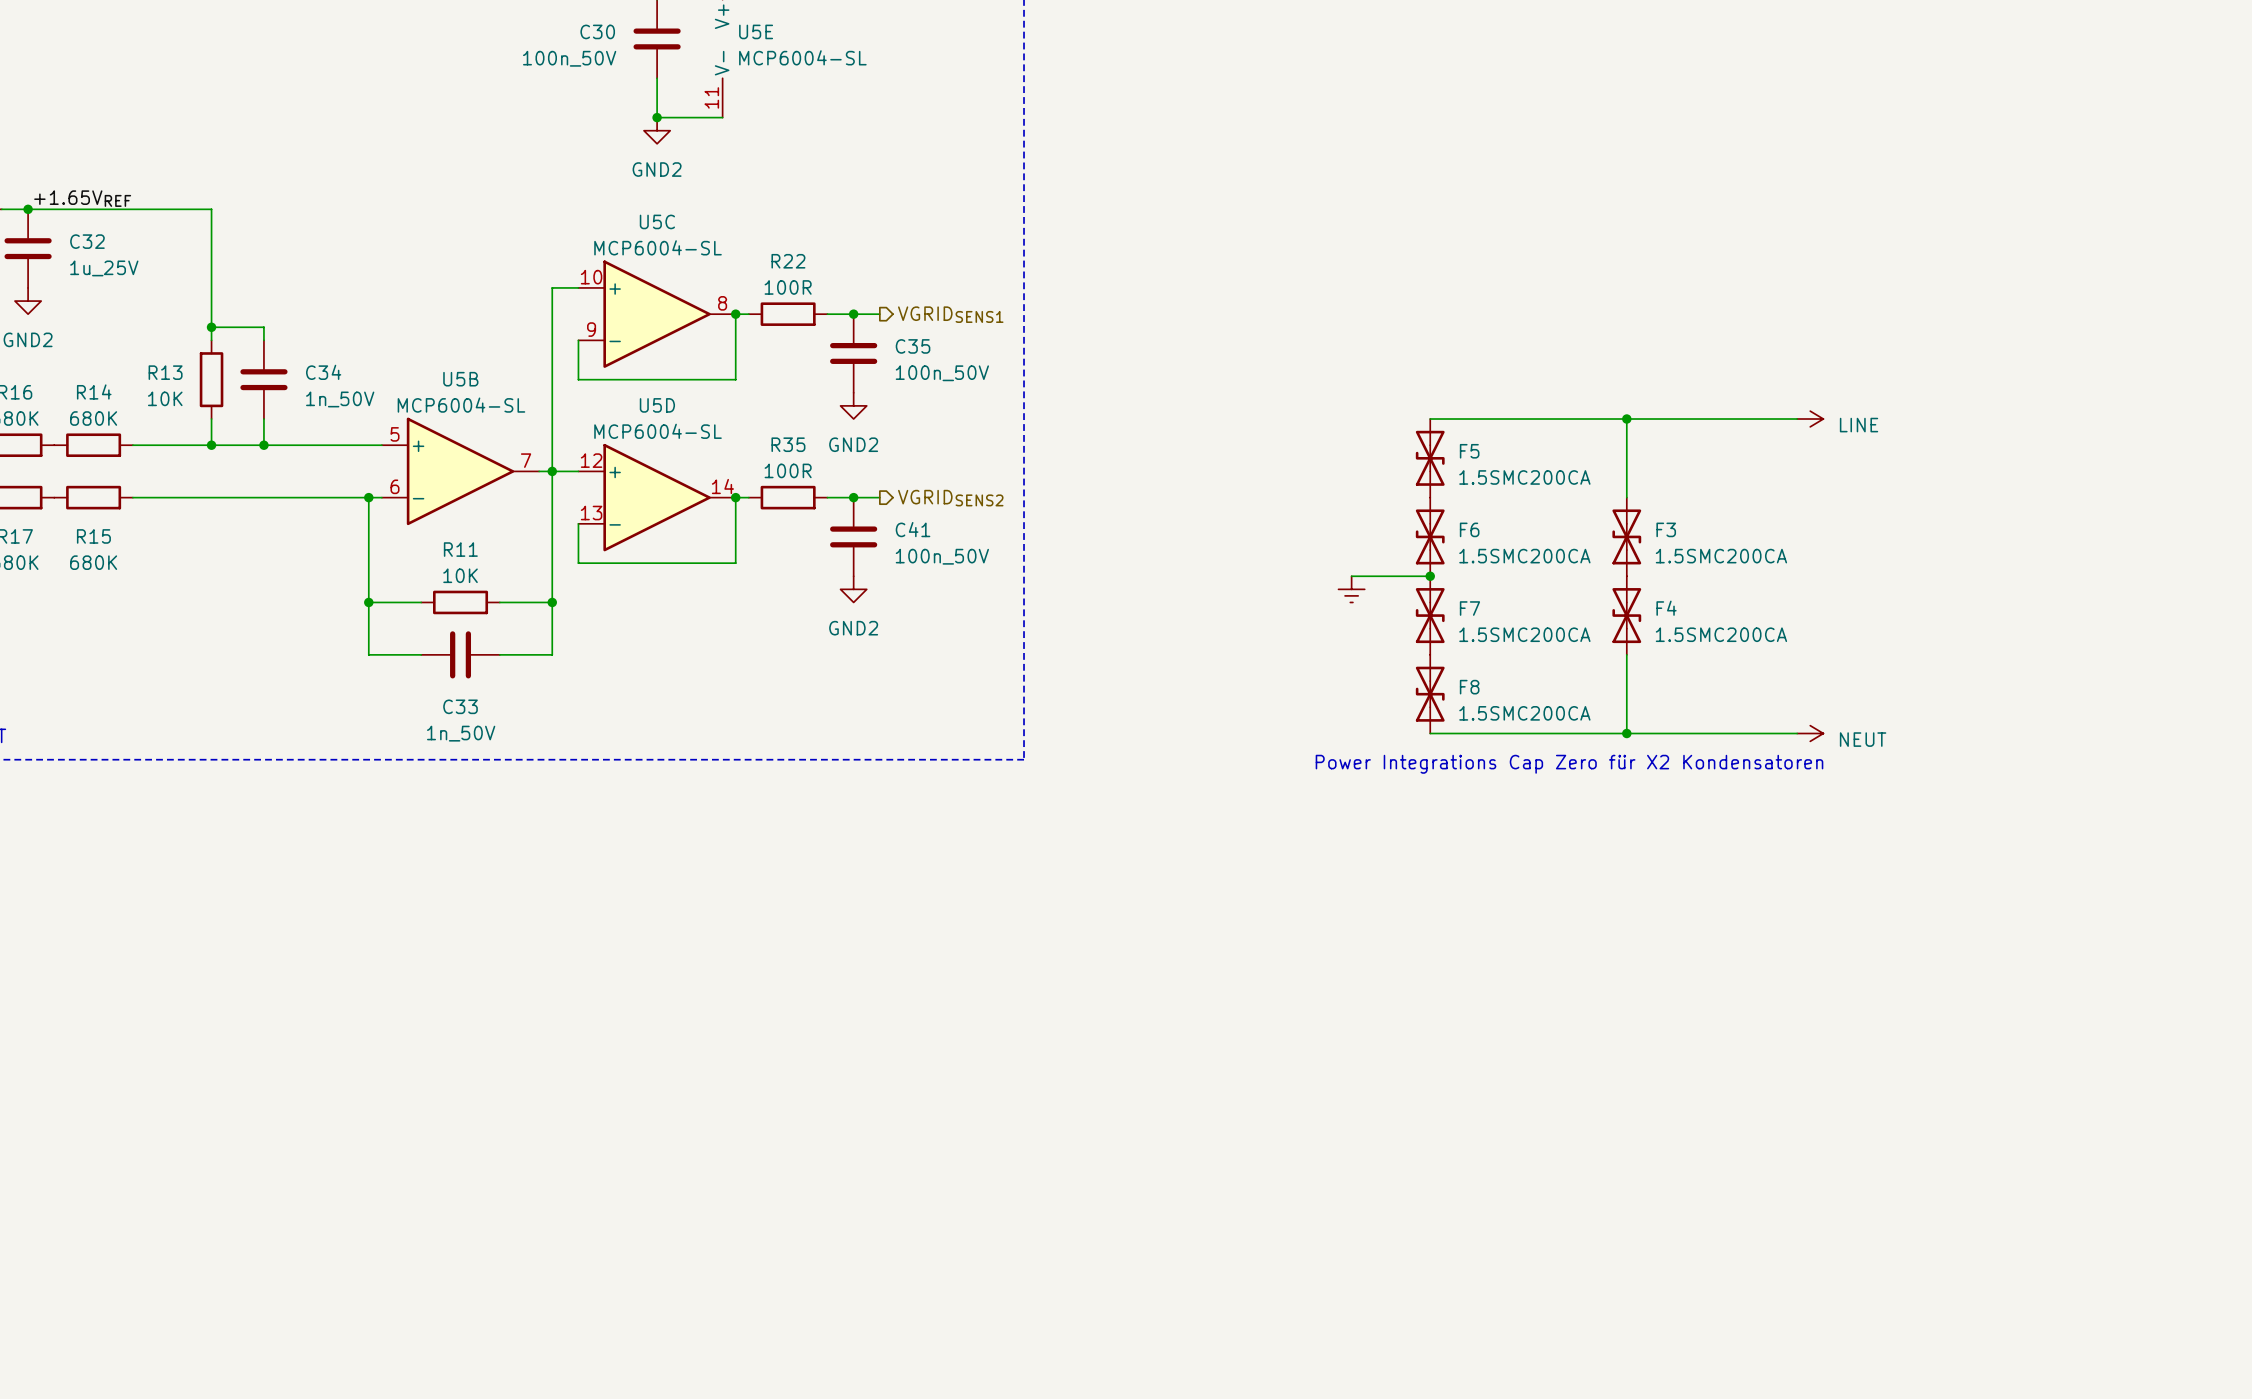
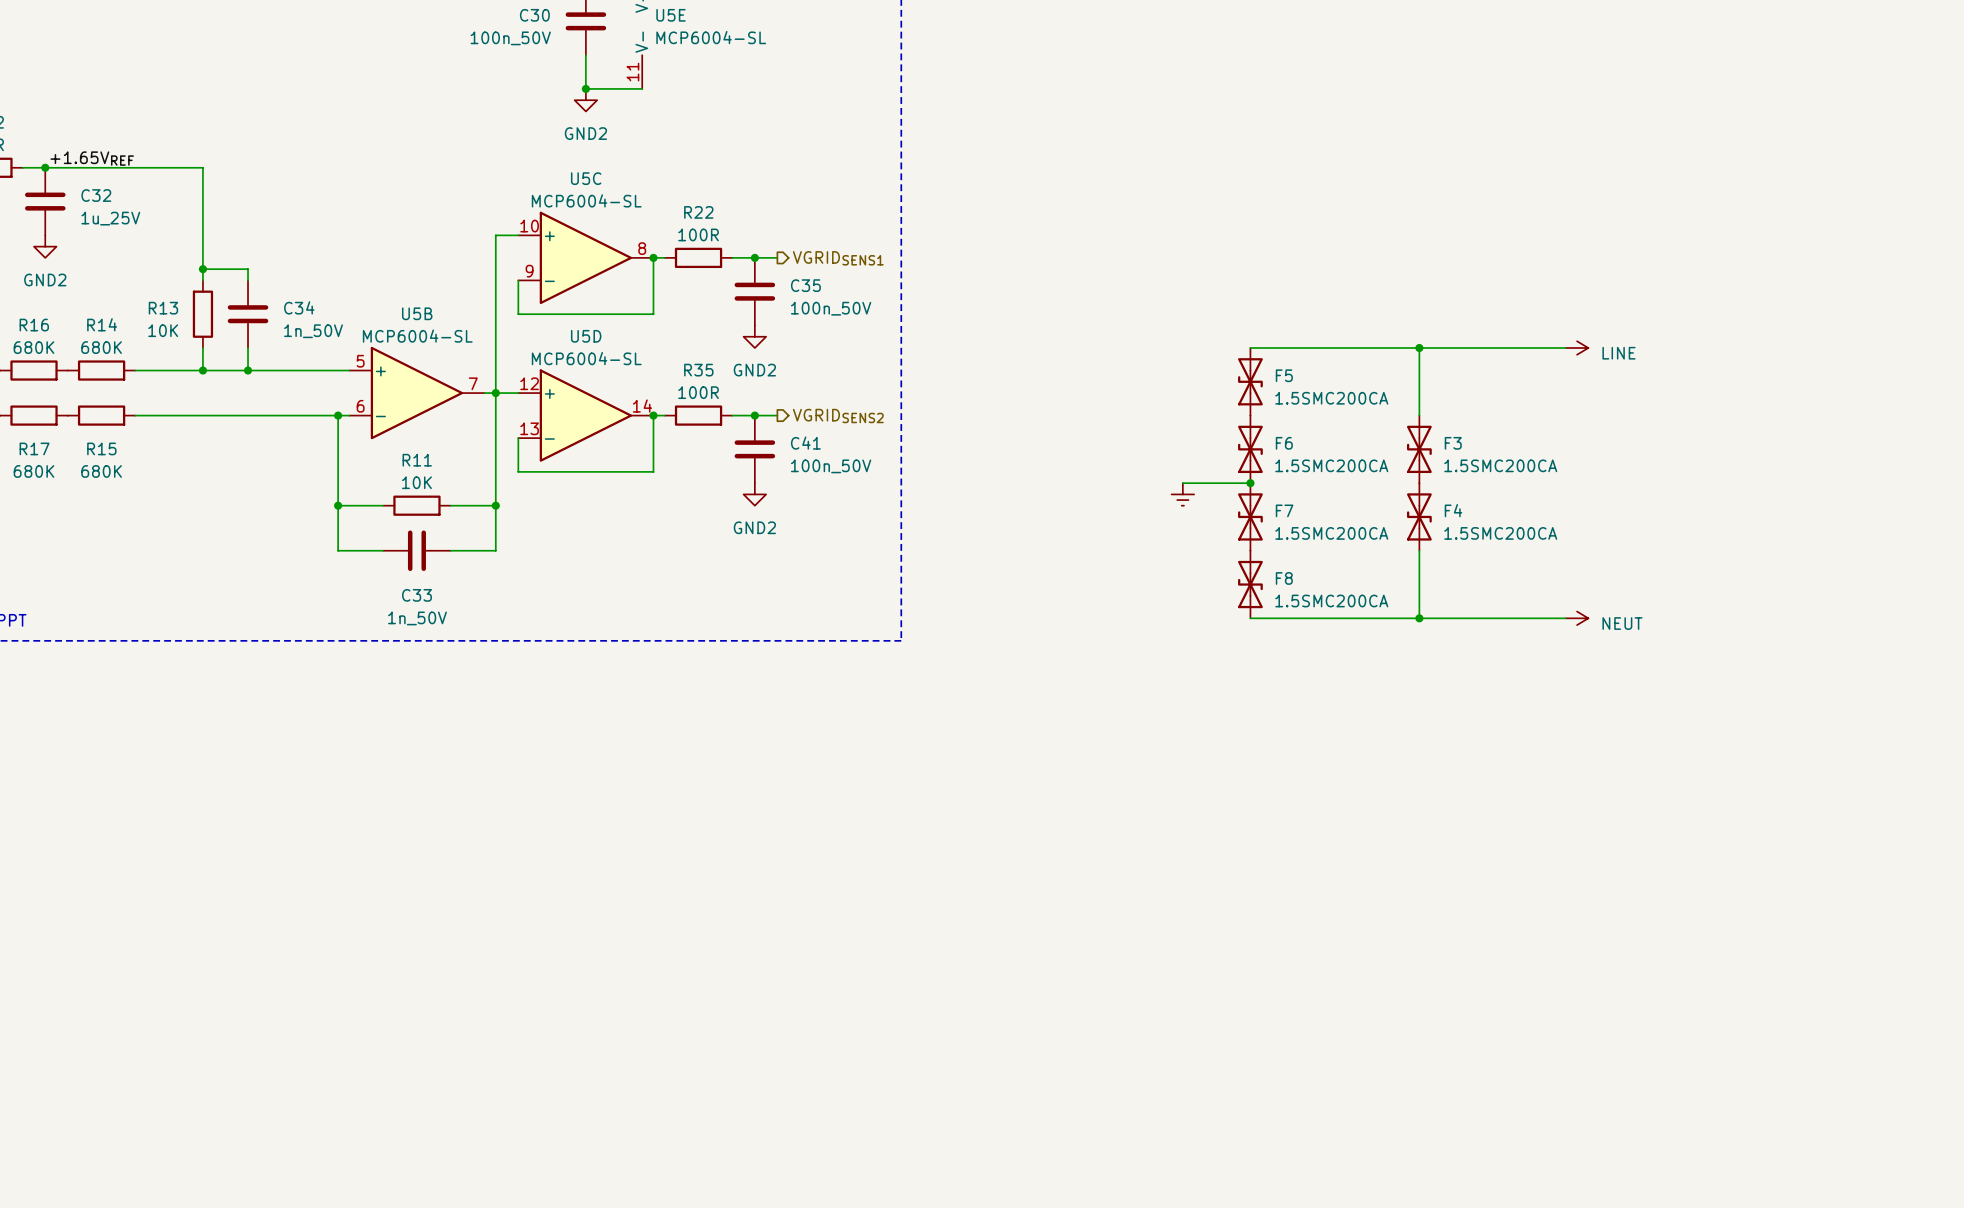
text: Power Integrations Cap Zero für X2 Kondensatoren (1569, 764) -> none

